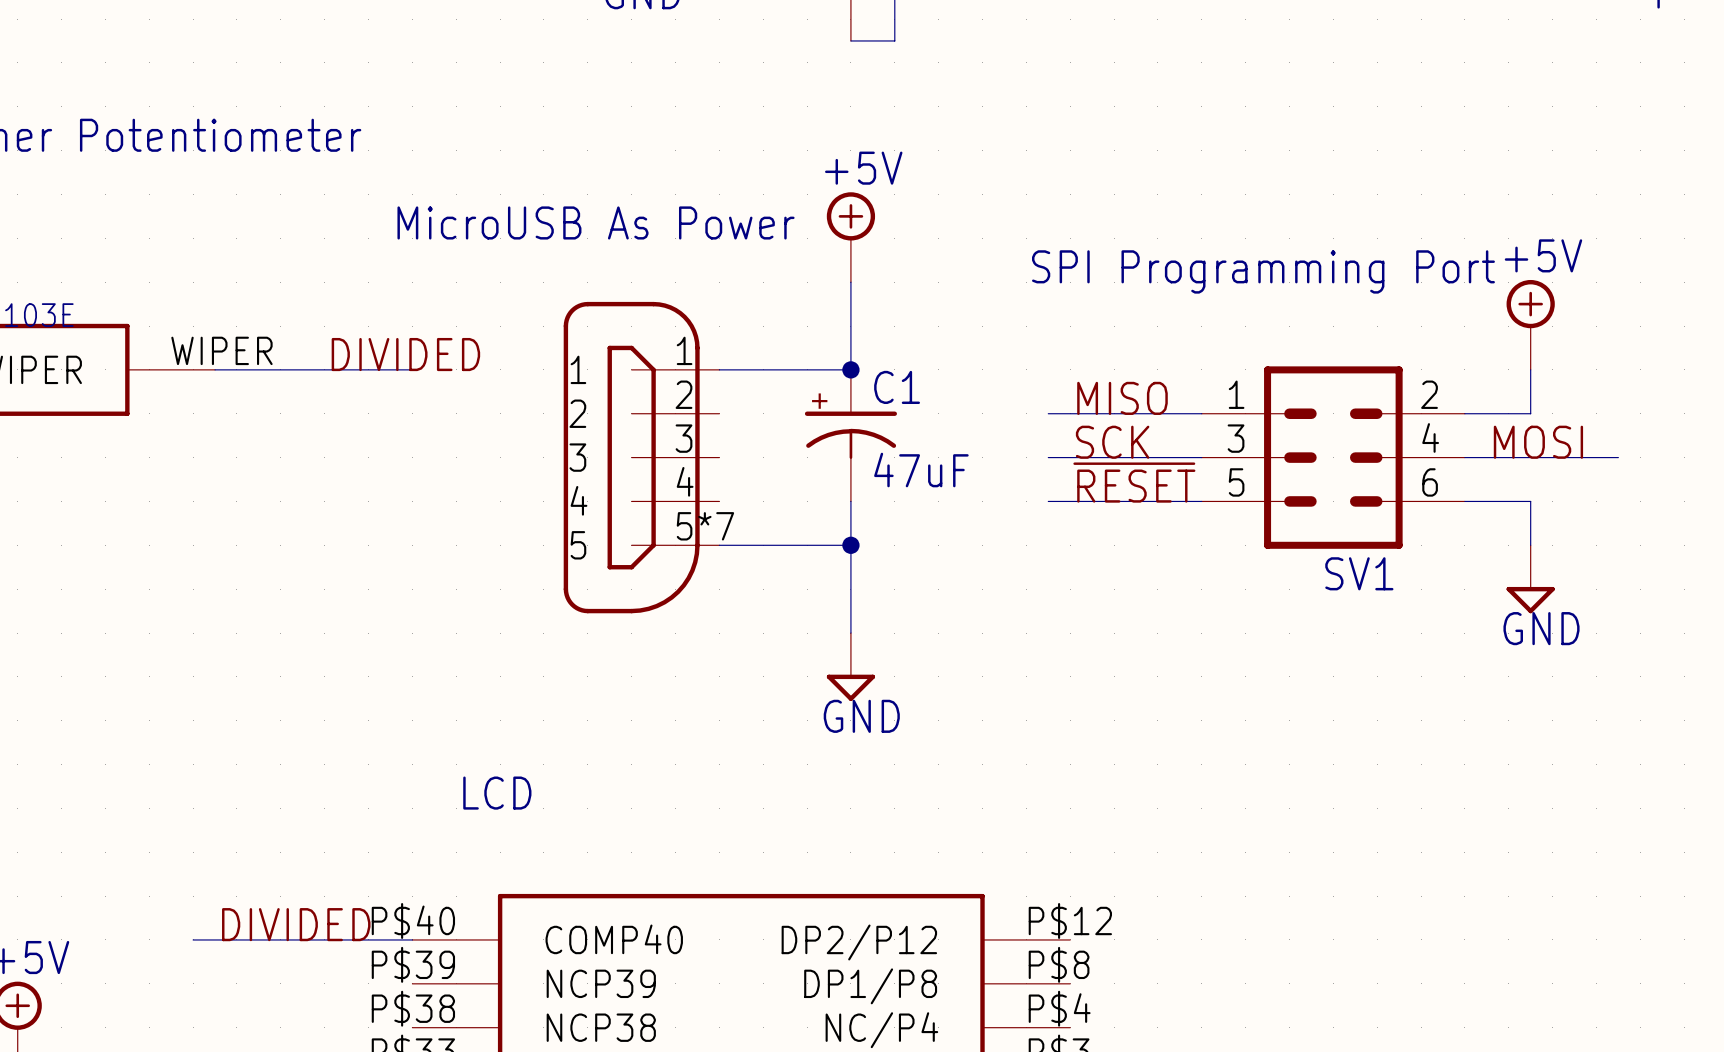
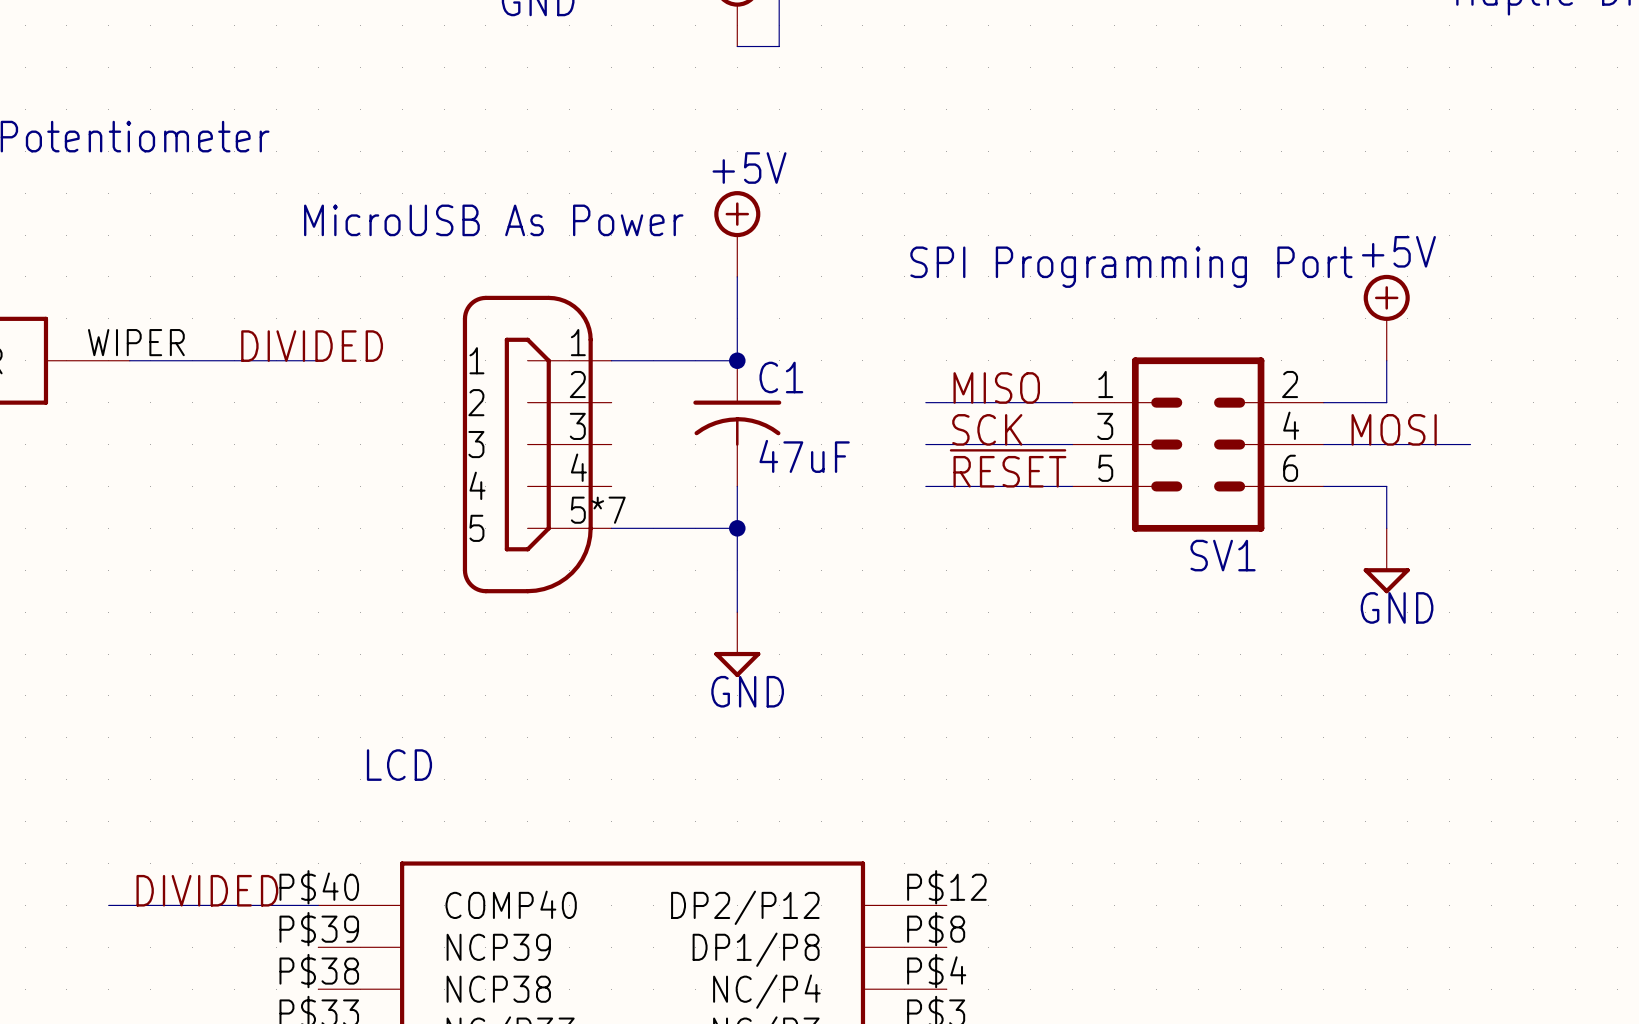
C1 symbol: [804, 369, 897, 502] -> [693, 360, 782, 487]

